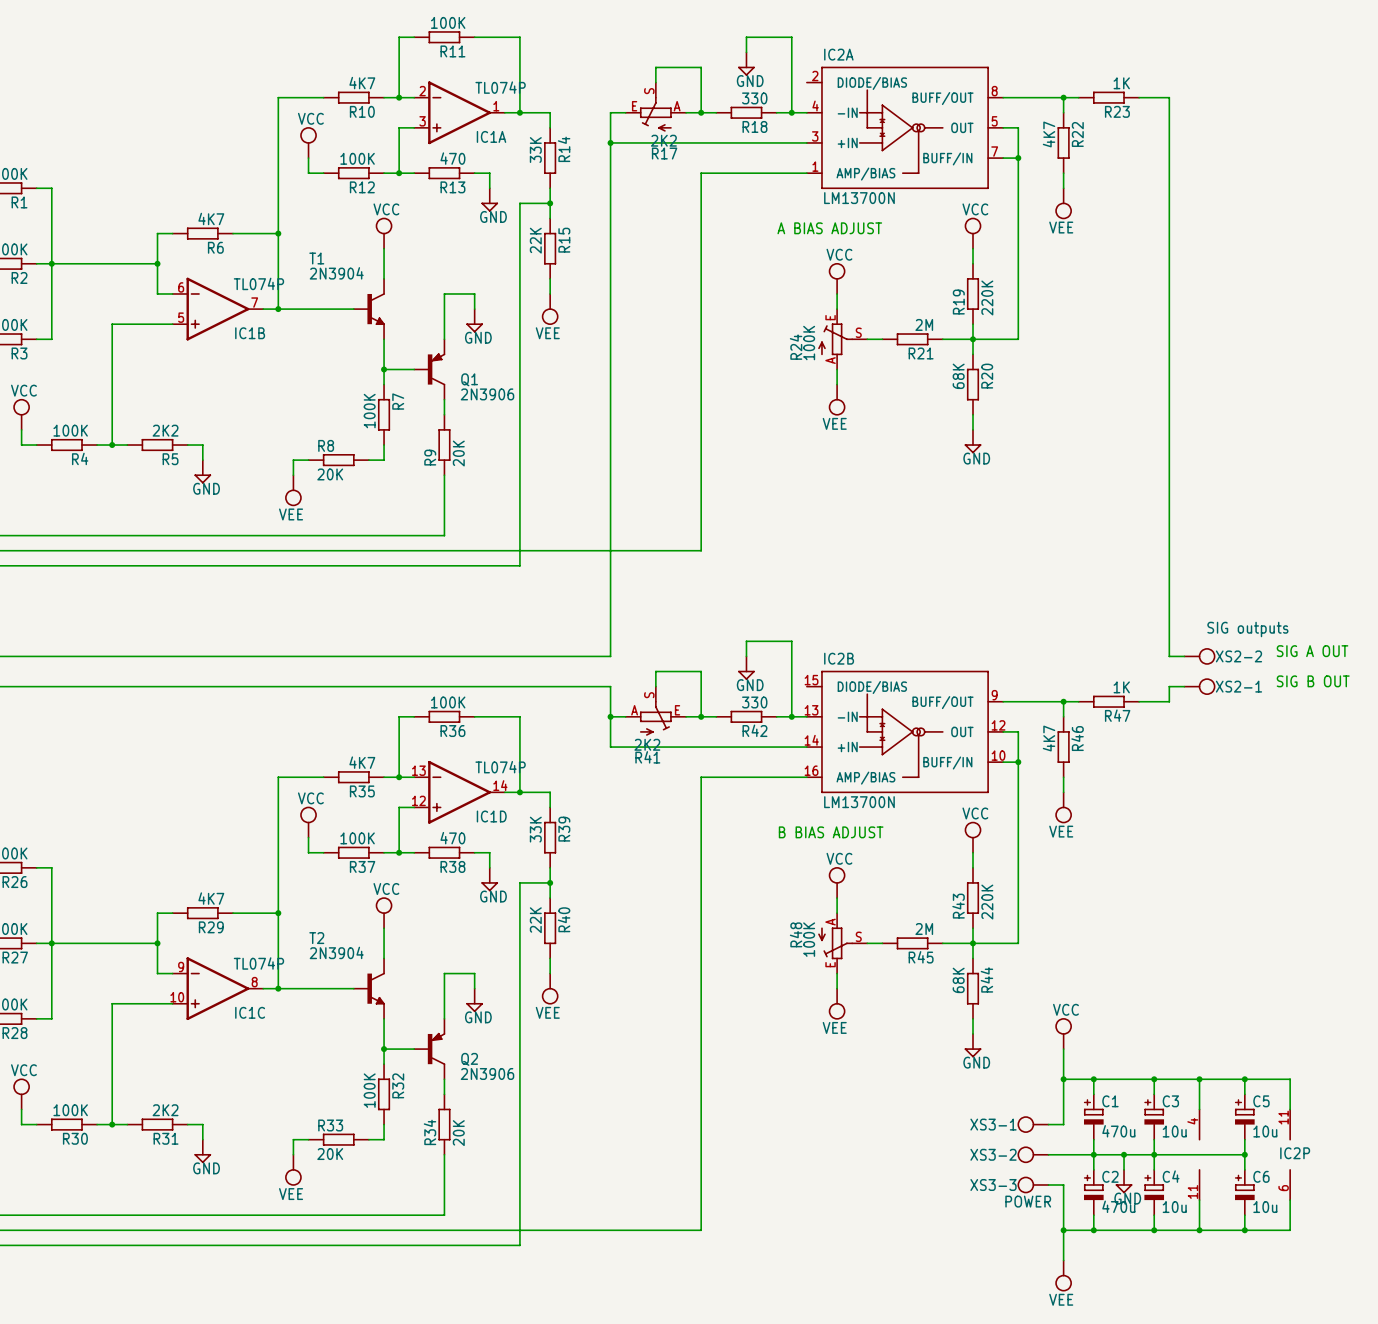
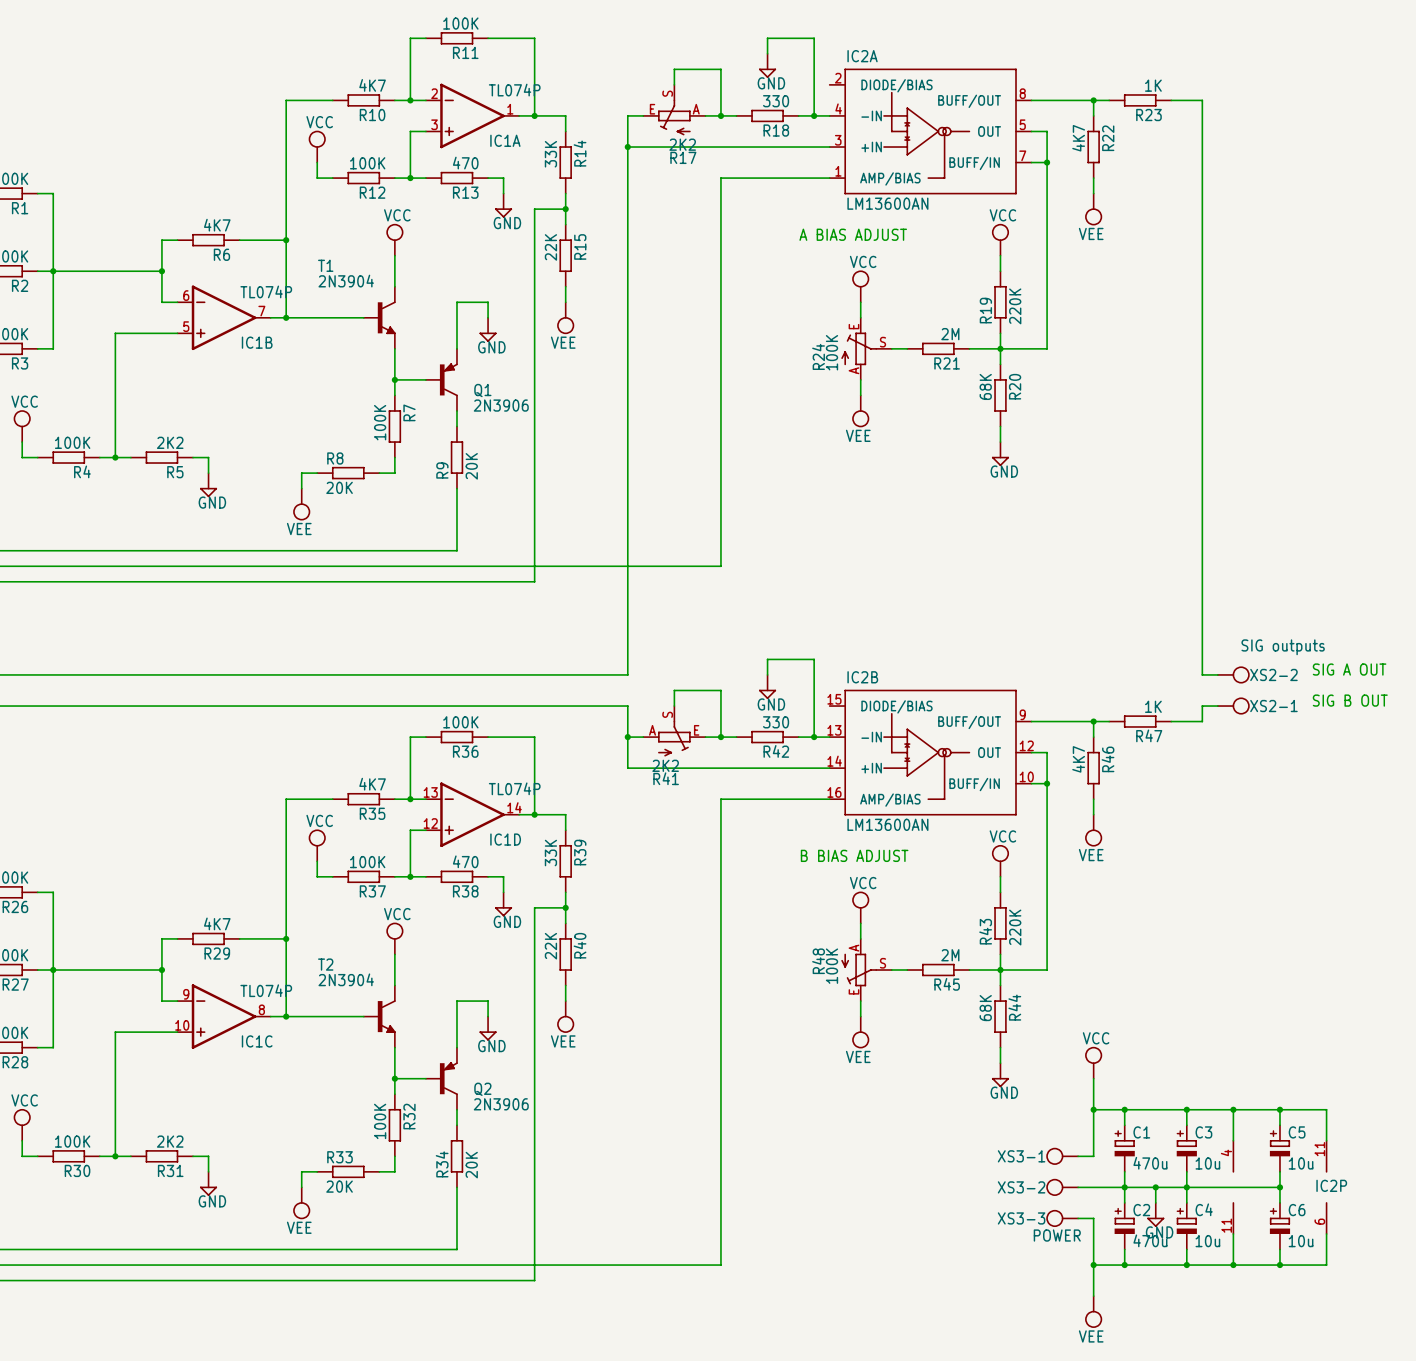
IC2A value: LM13700N (859, 198) -> LM13600AN (887, 203)
IC2B value: LM13700N (859, 802) -> LM13600AN (887, 824)

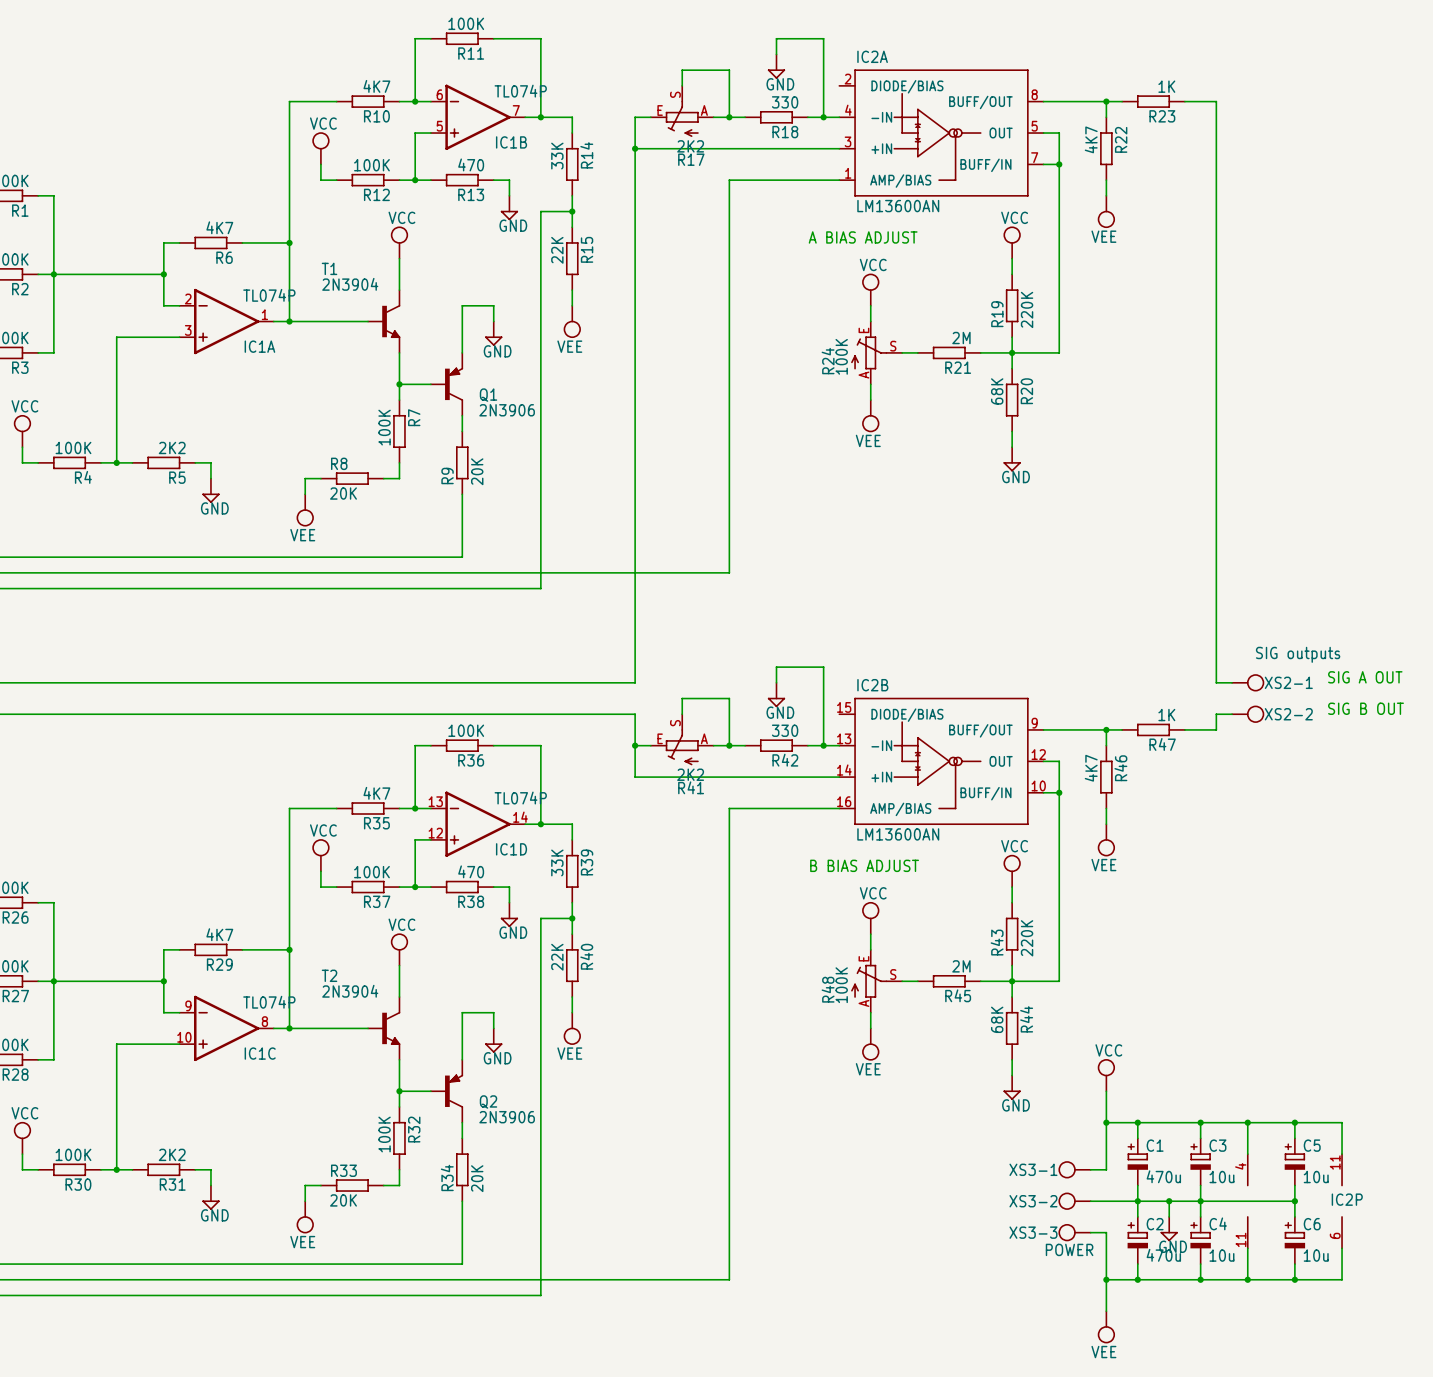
IC1A position: (472, 115) -> (226, 321)
IC1B position: (224, 317) -> (478, 117)
XS2-2 name: XS2-2 (1273, 674) -> XS2-1 (1288, 682)
XS2-1 name: XS2-1 (1273, 706) -> XS2-2 (1288, 714)
R41 flip: as is (674, 738) -> left-right (682, 747)
R48 flip: as is (859, 970) -> up-down (869, 981)

